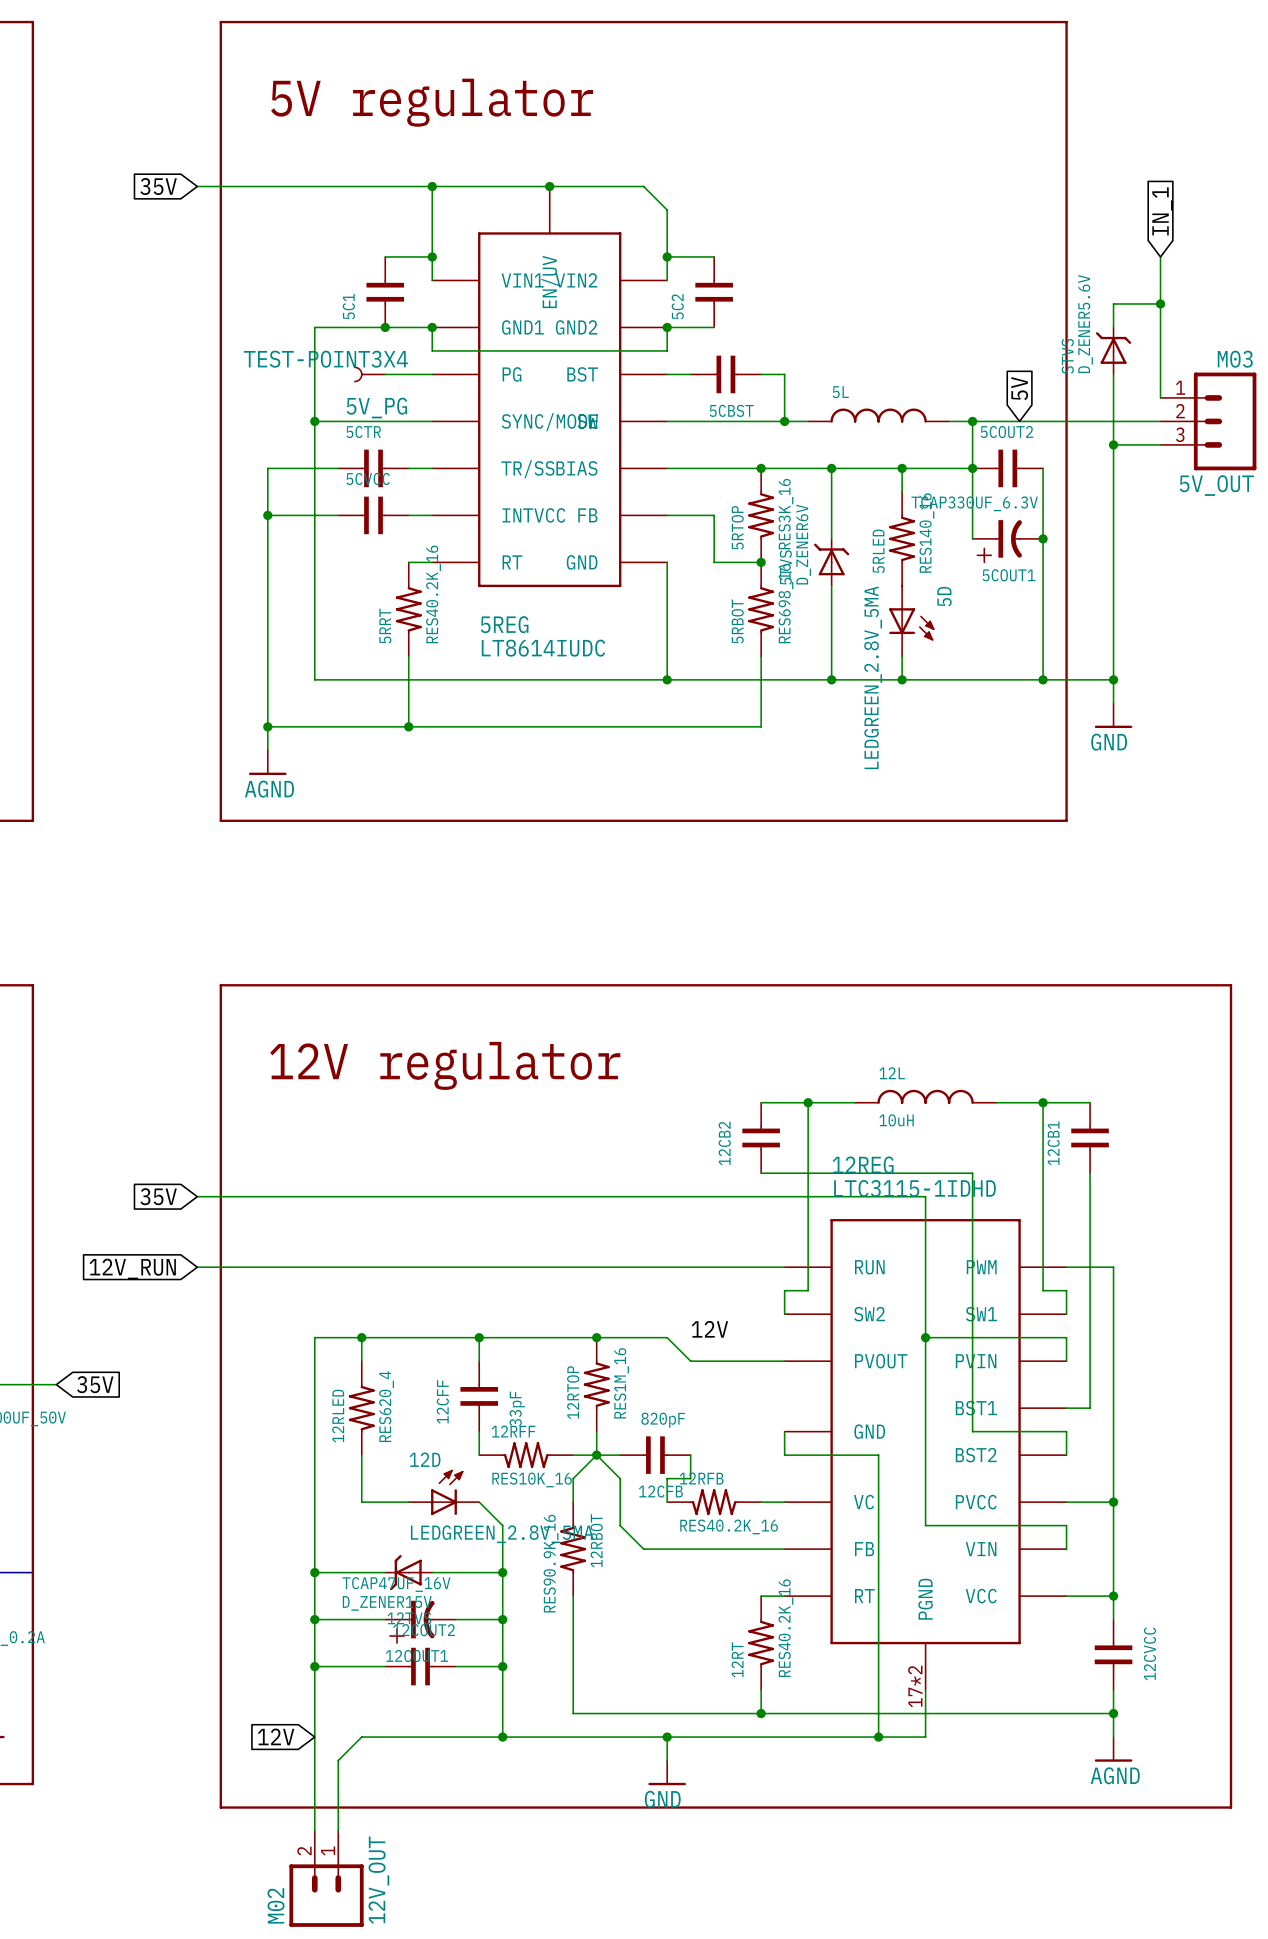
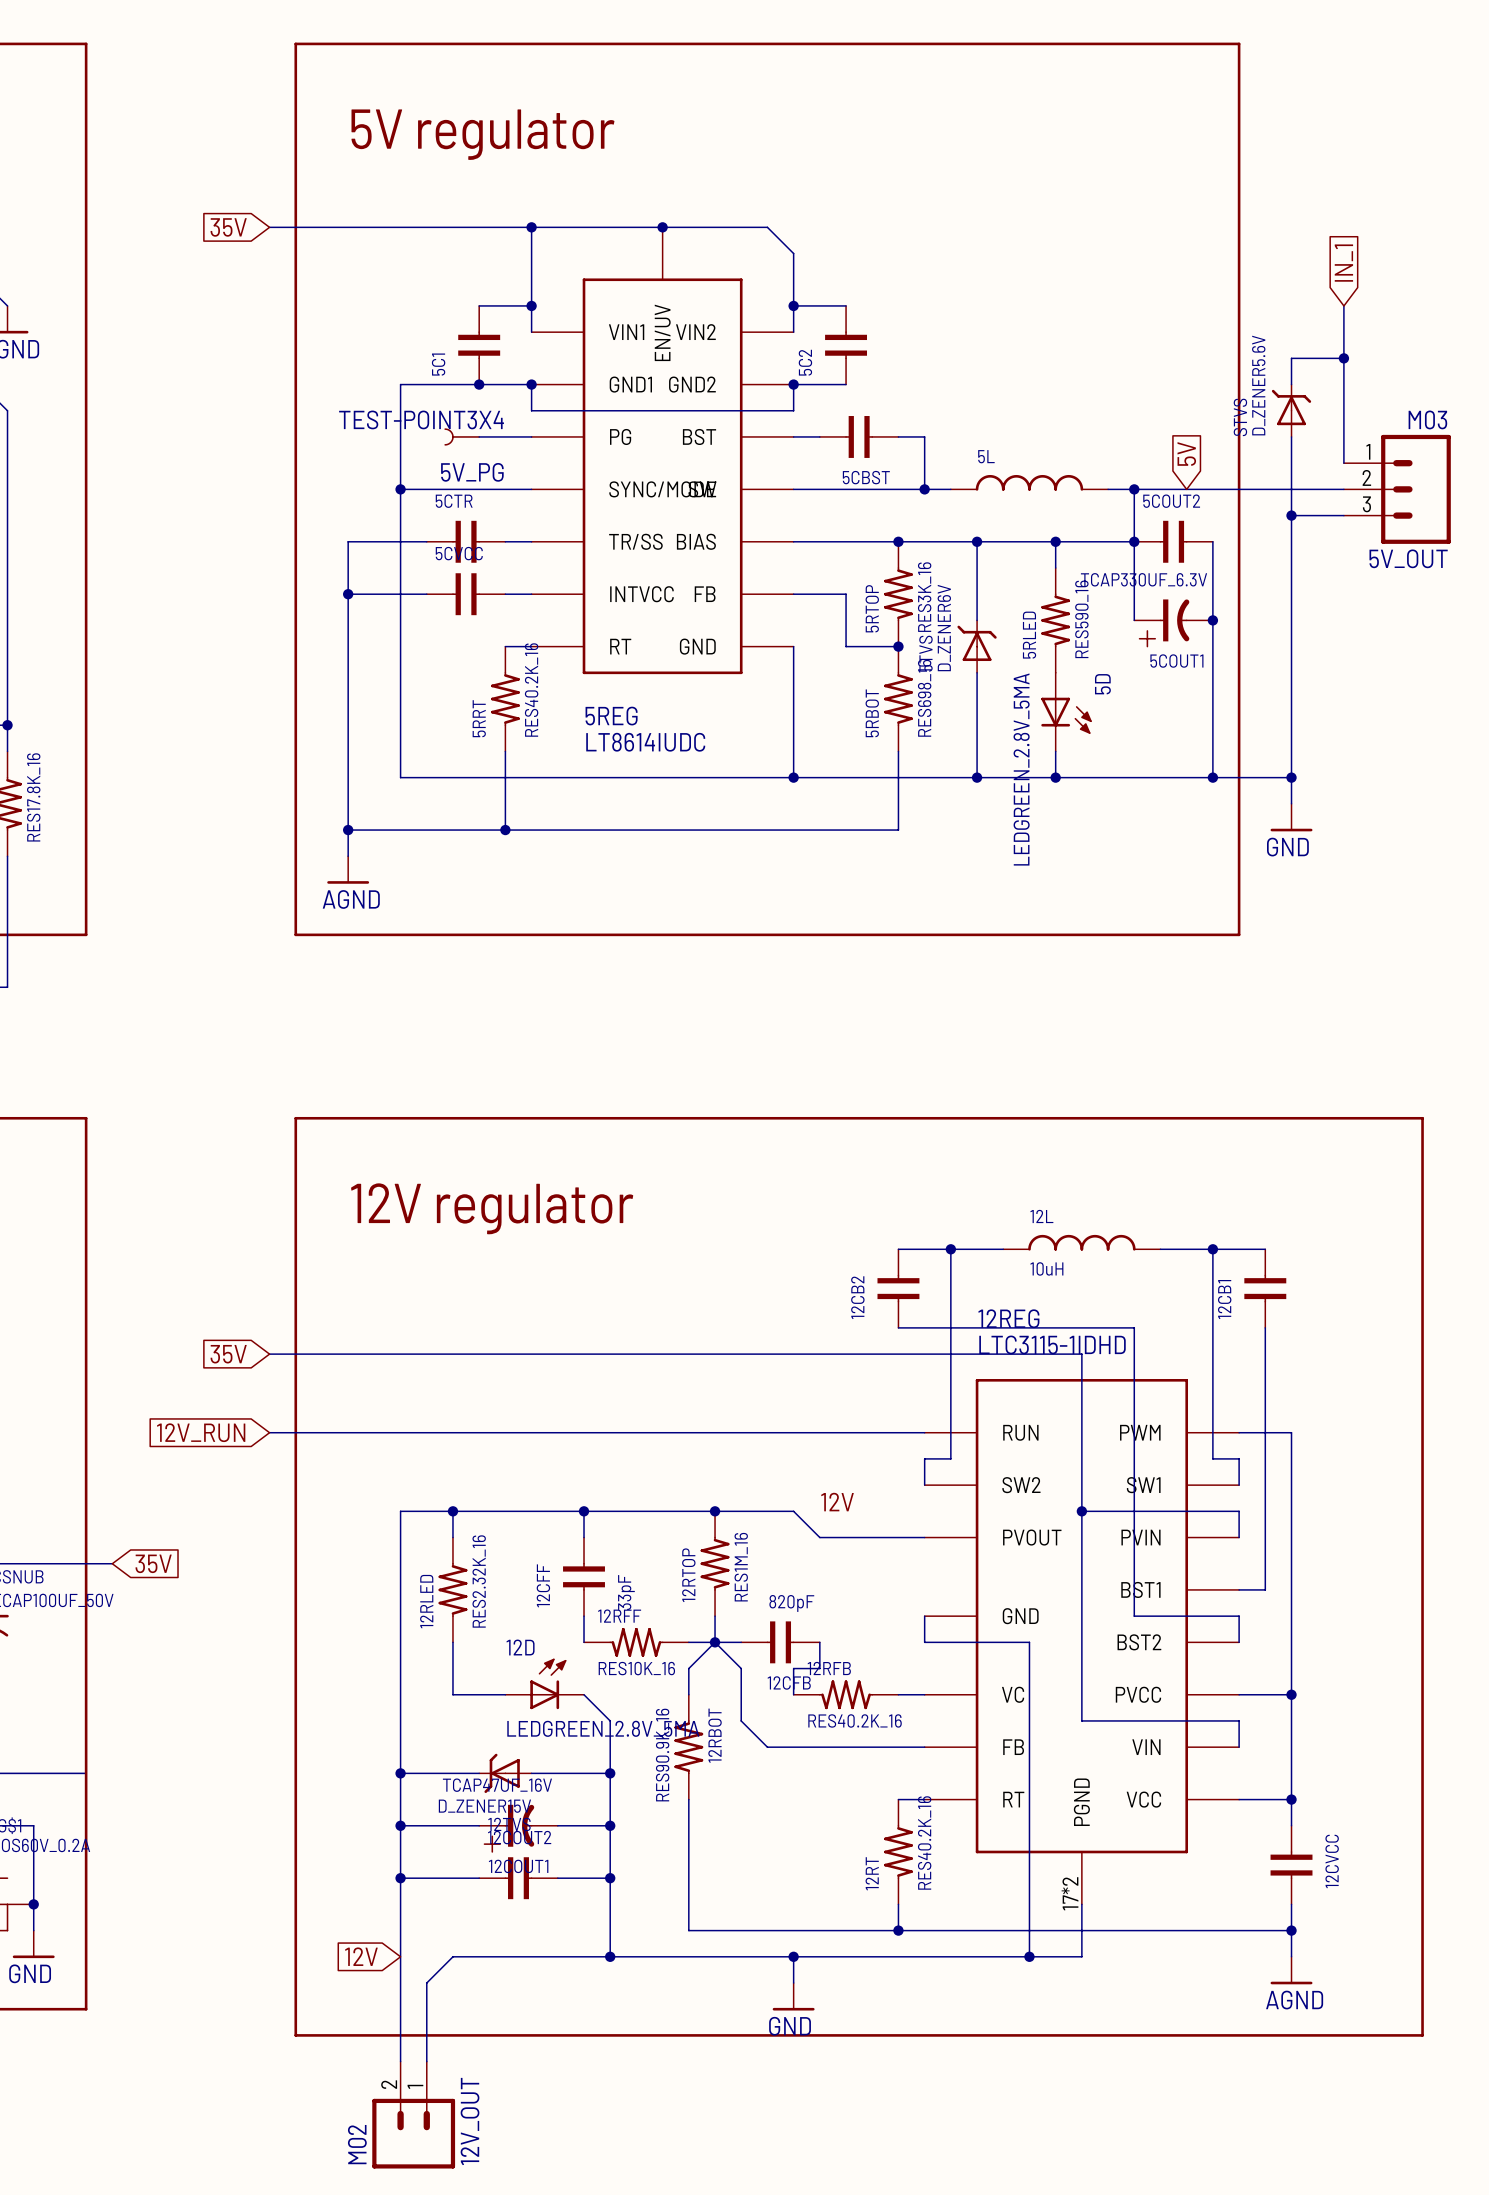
5RLED value: RES140_16 (926, 533) -> RES590_16 (1081, 619)
12RLED value: RES620_4 (386, 1406) -> RES2.32K_16 (479, 1581)

